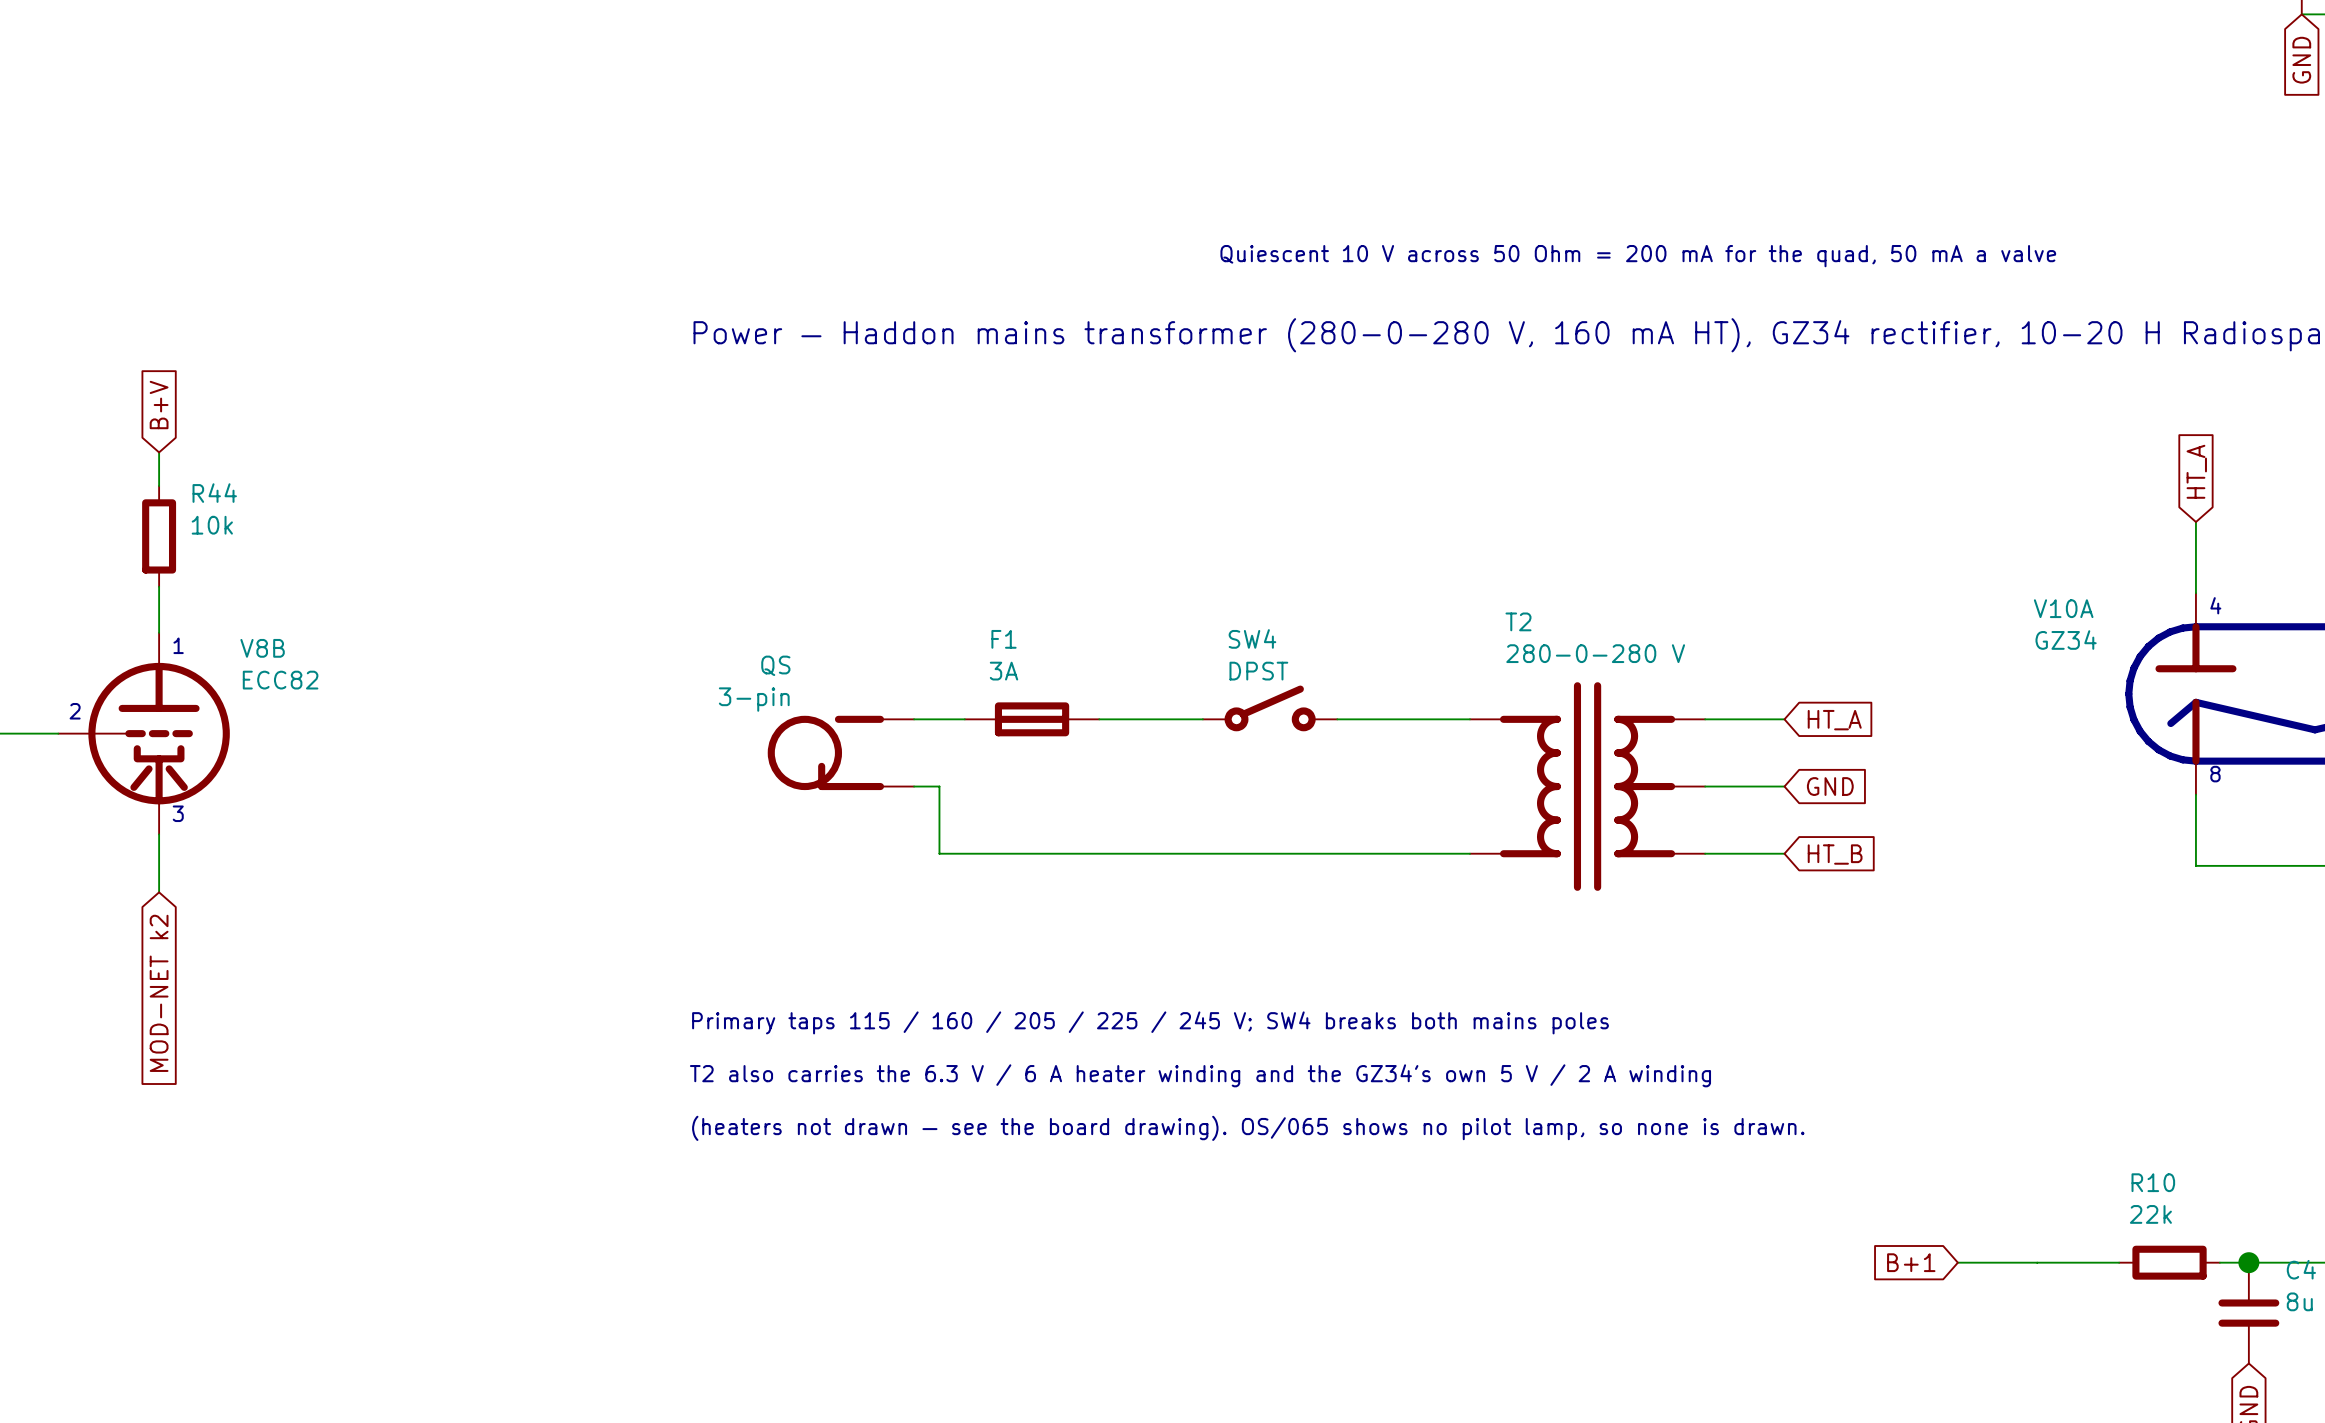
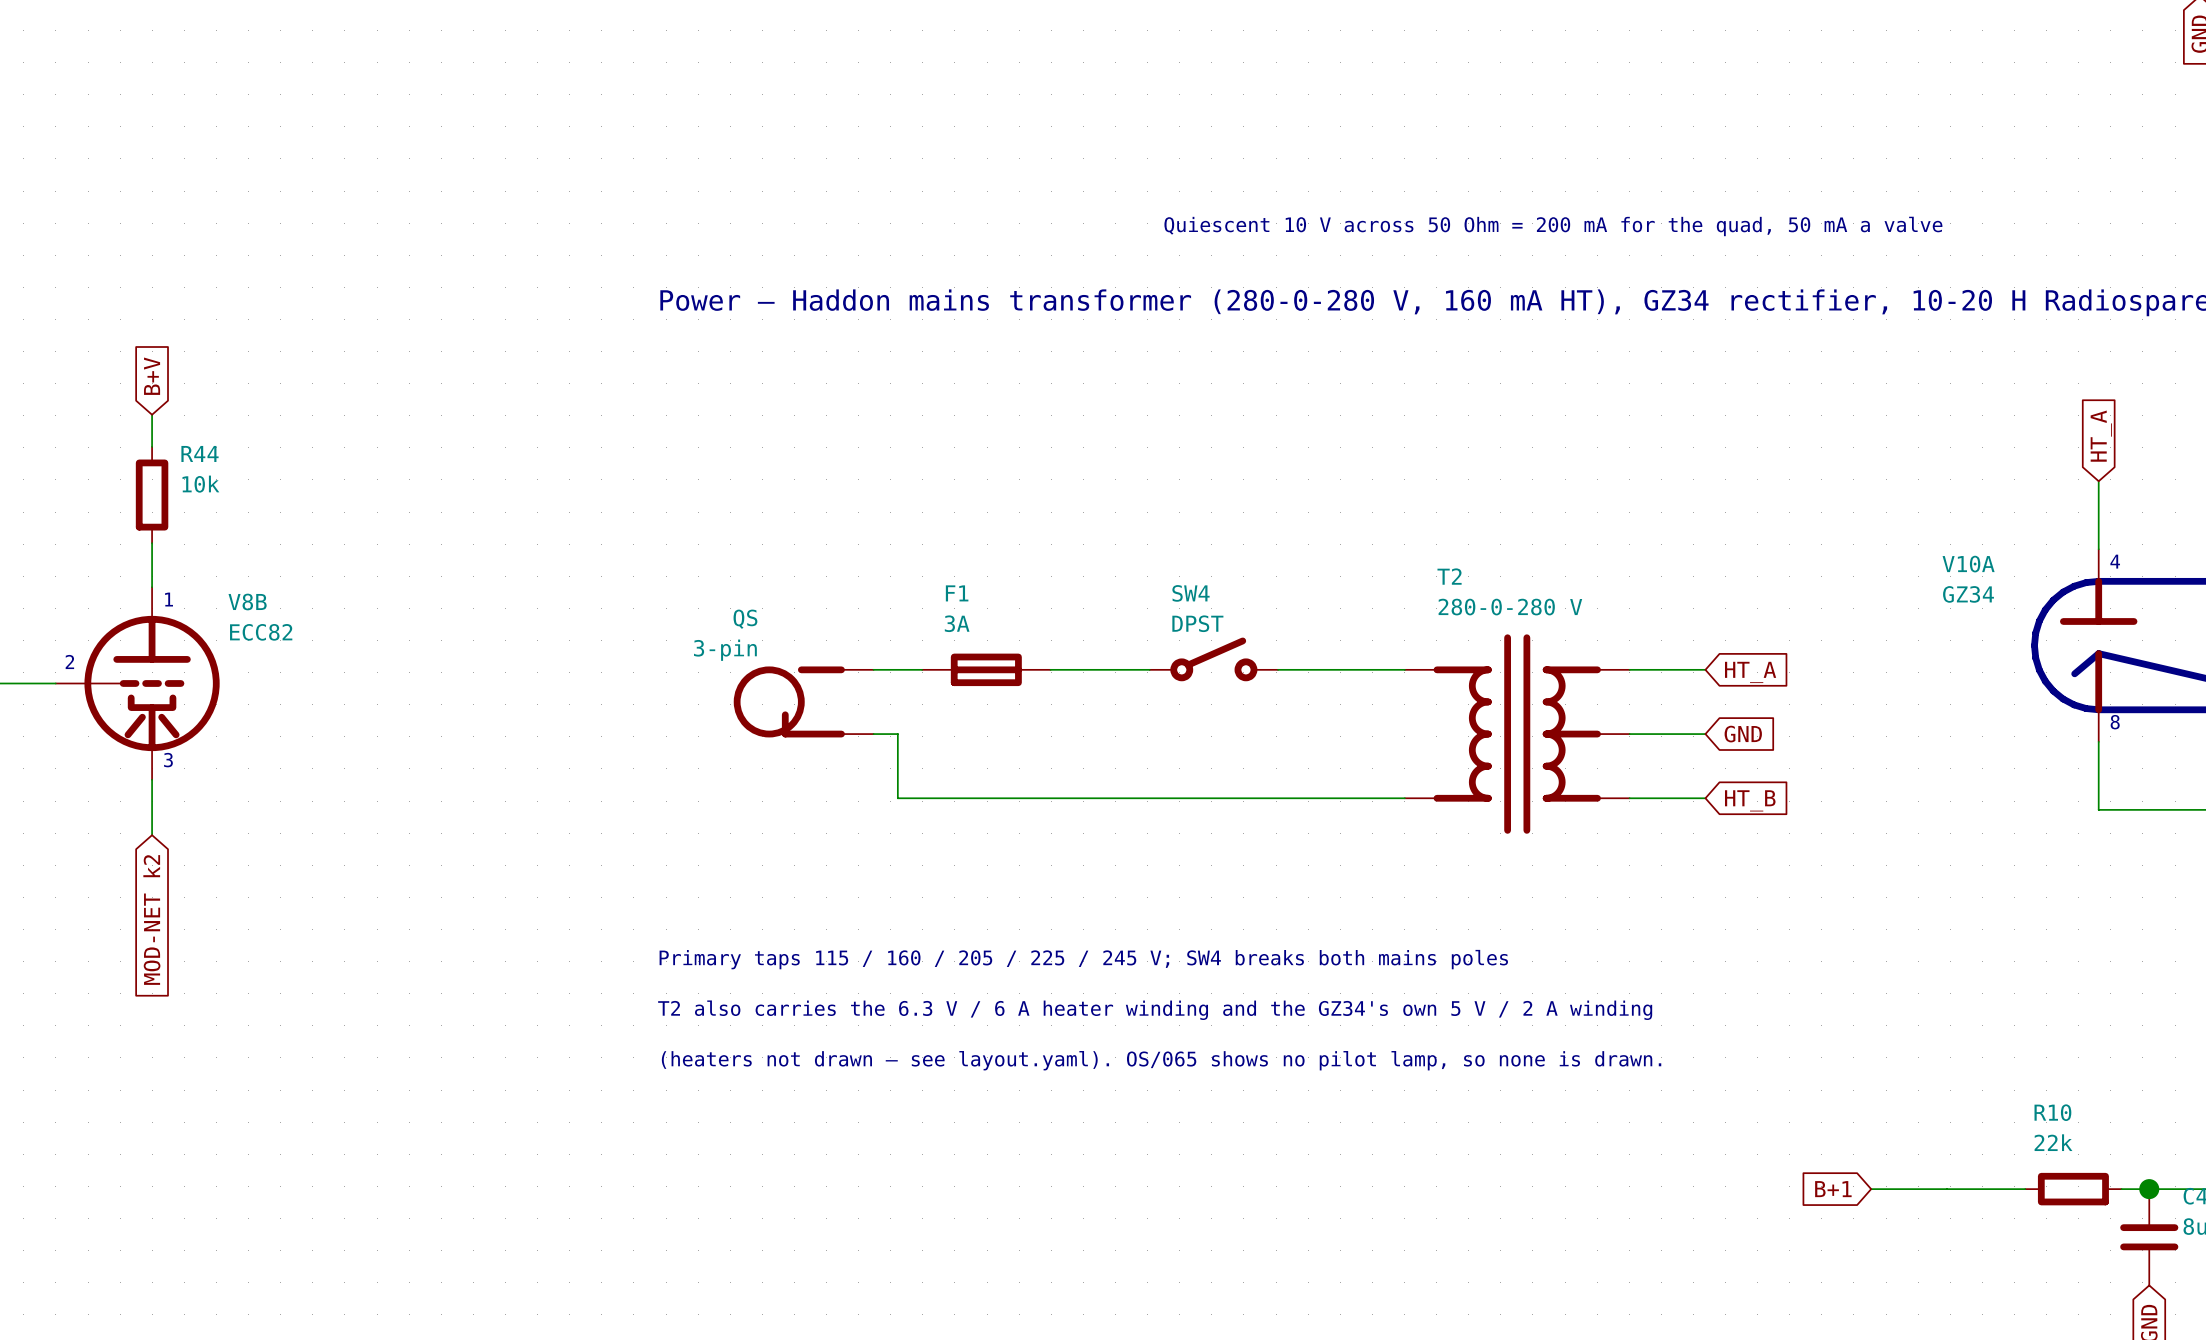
text: (heaters not drawn — see the board drawing). OS/065 shows no pilot lamp, so none is drawn. (1248, 1128) -> (heaters not drawn — see layout.yaml). OS/065 shows no pilot lamp, so none is drawn. (1161, 1060)

